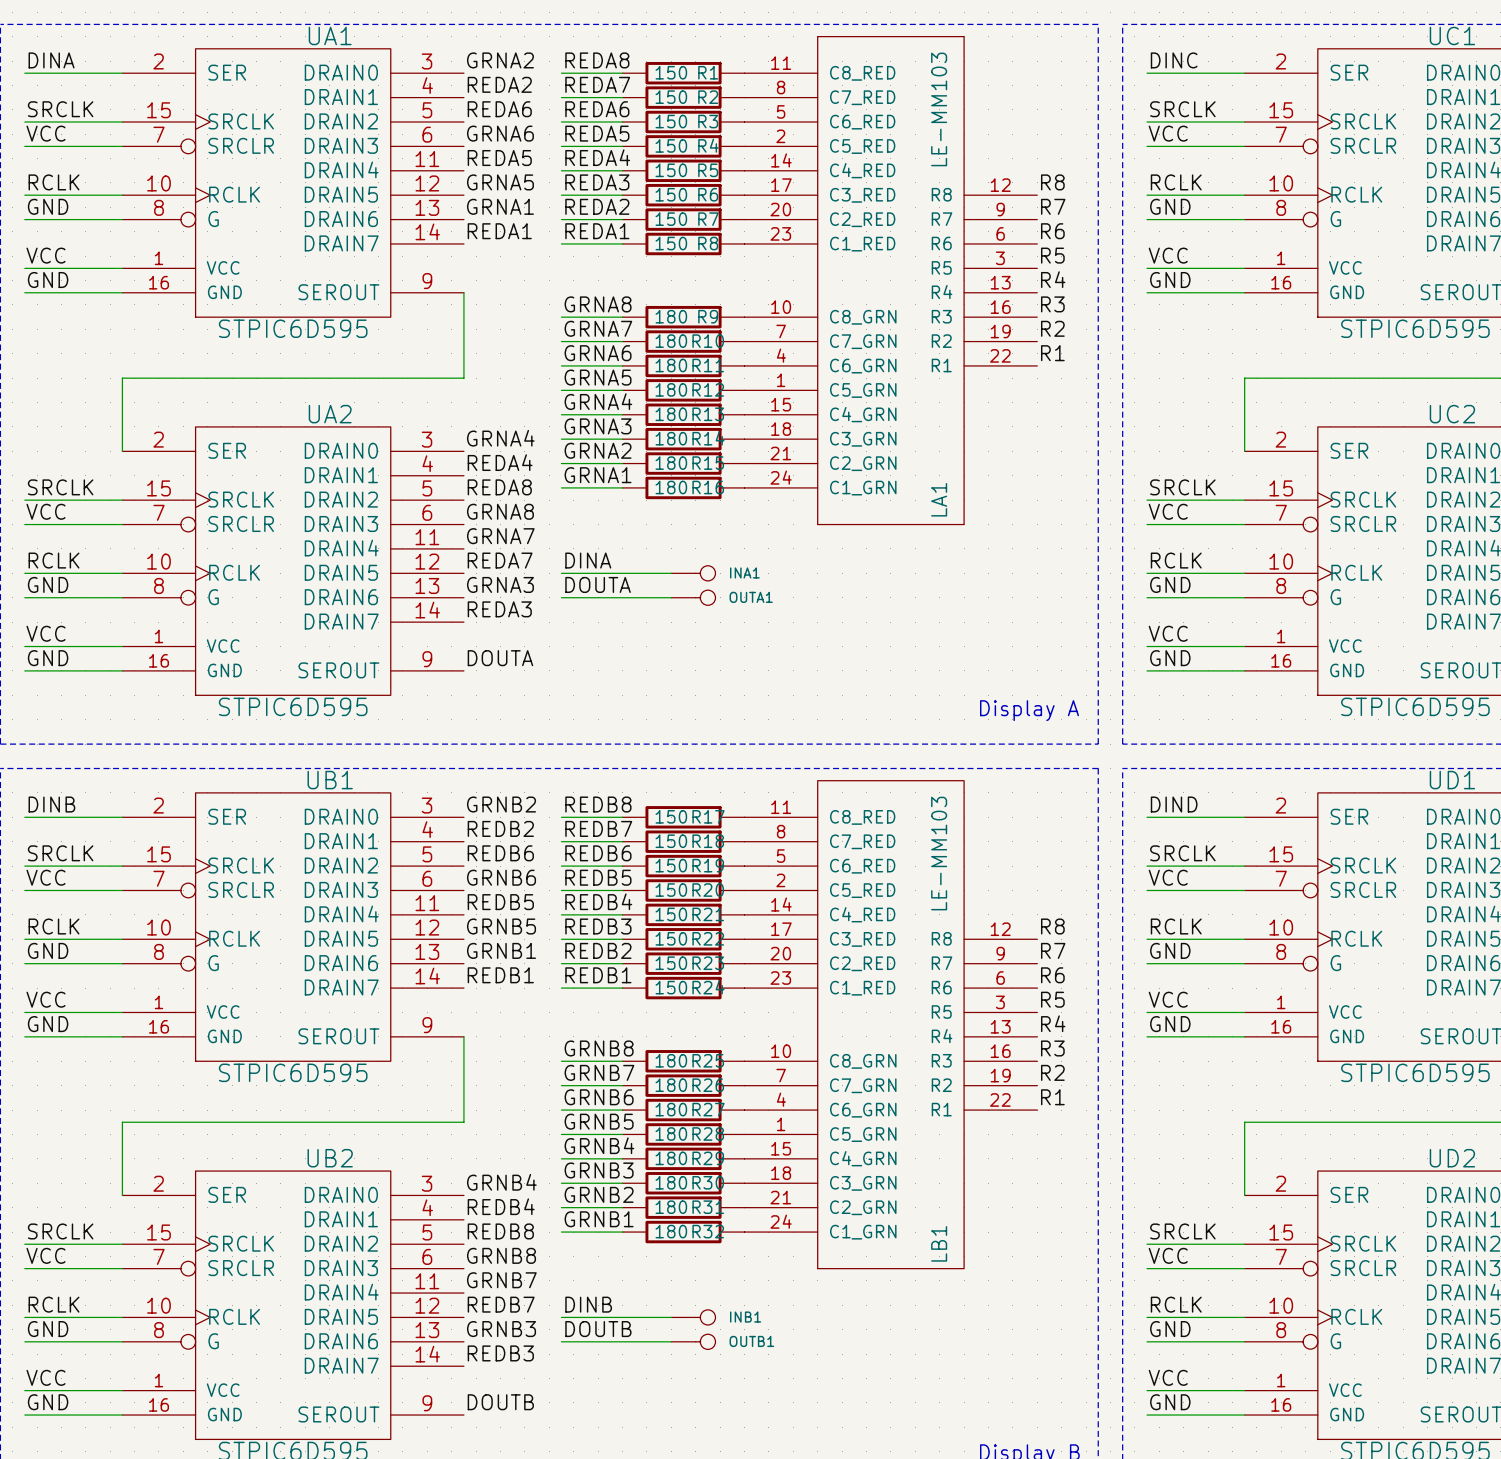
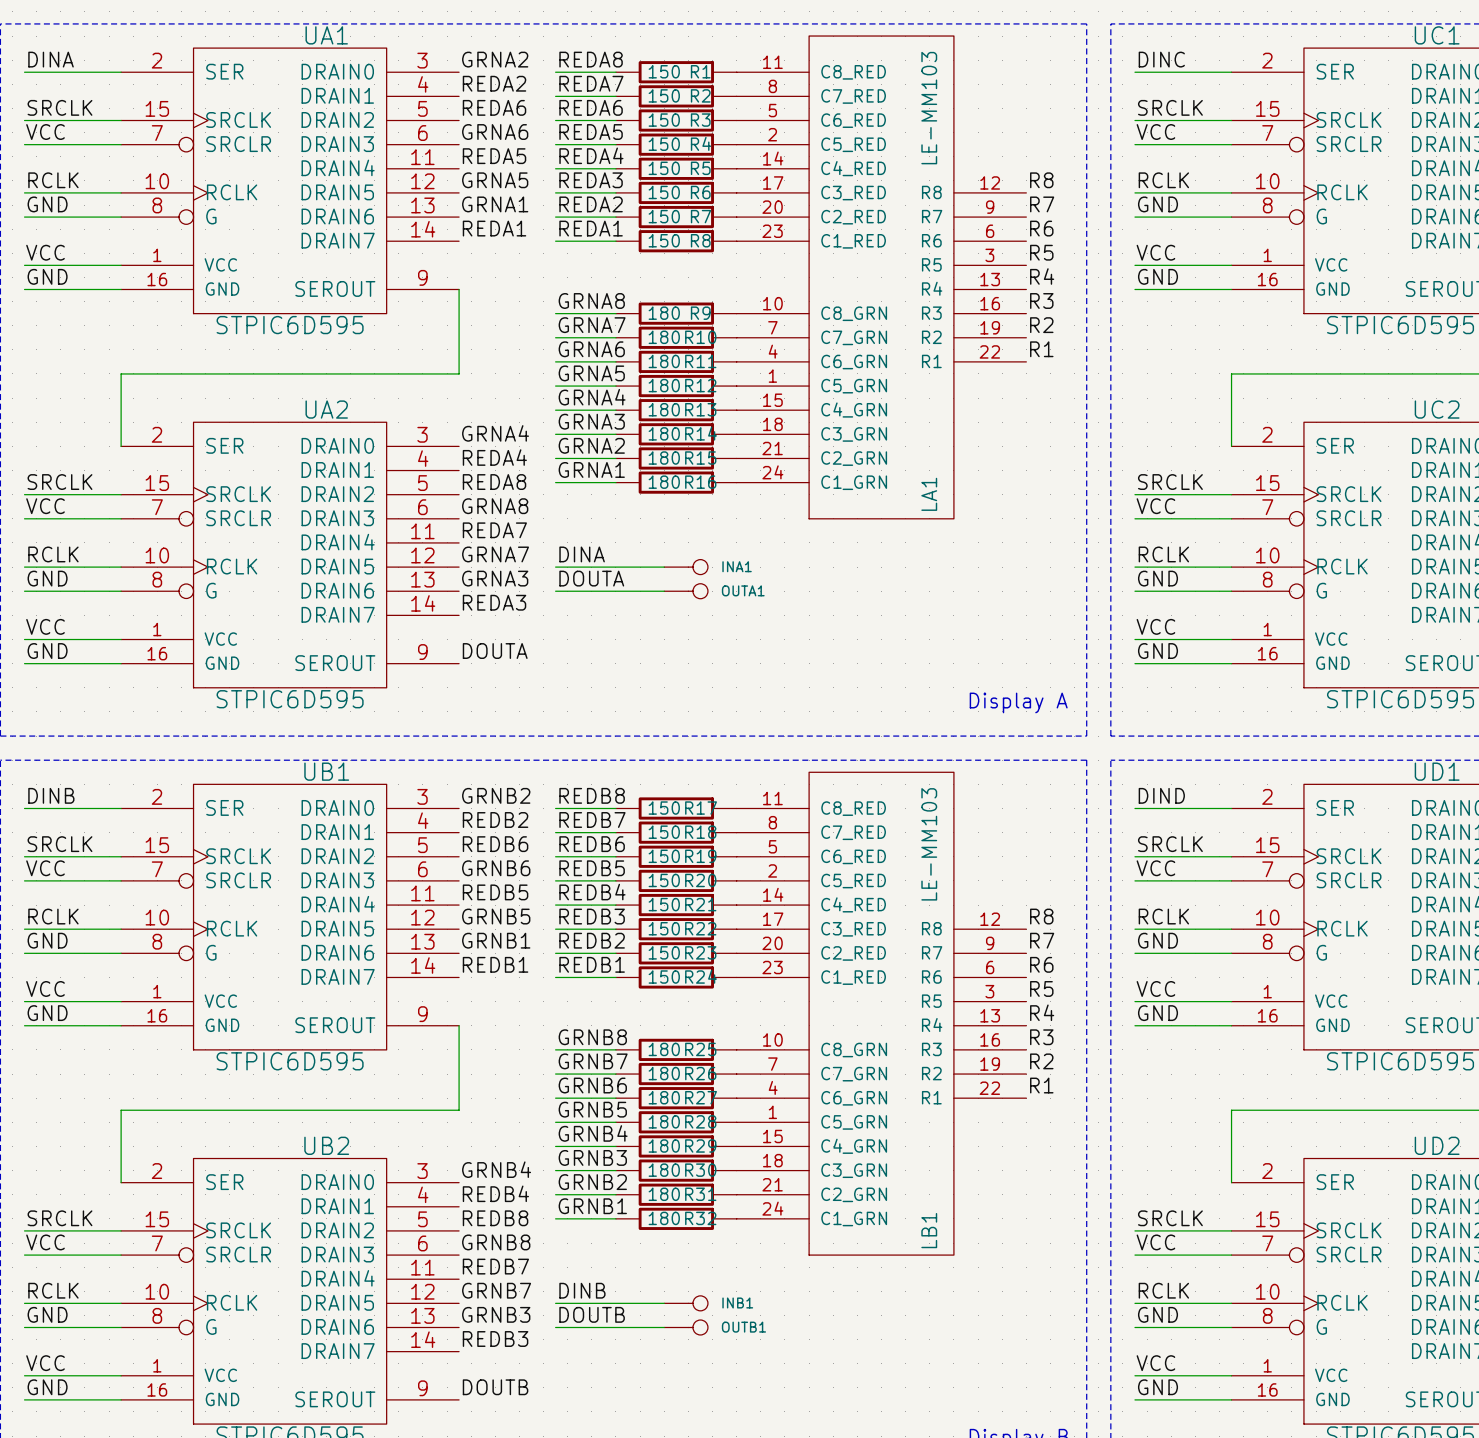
label: GRNA7 (500, 536) -> REDA7 (494, 530)
label: REDA7 (500, 560) -> GRNA7 (495, 554)
label: GRNB7 (501, 1280) -> REDB7 (495, 1266)
label: REDB7 (501, 1304) -> GRNB7 (496, 1290)

